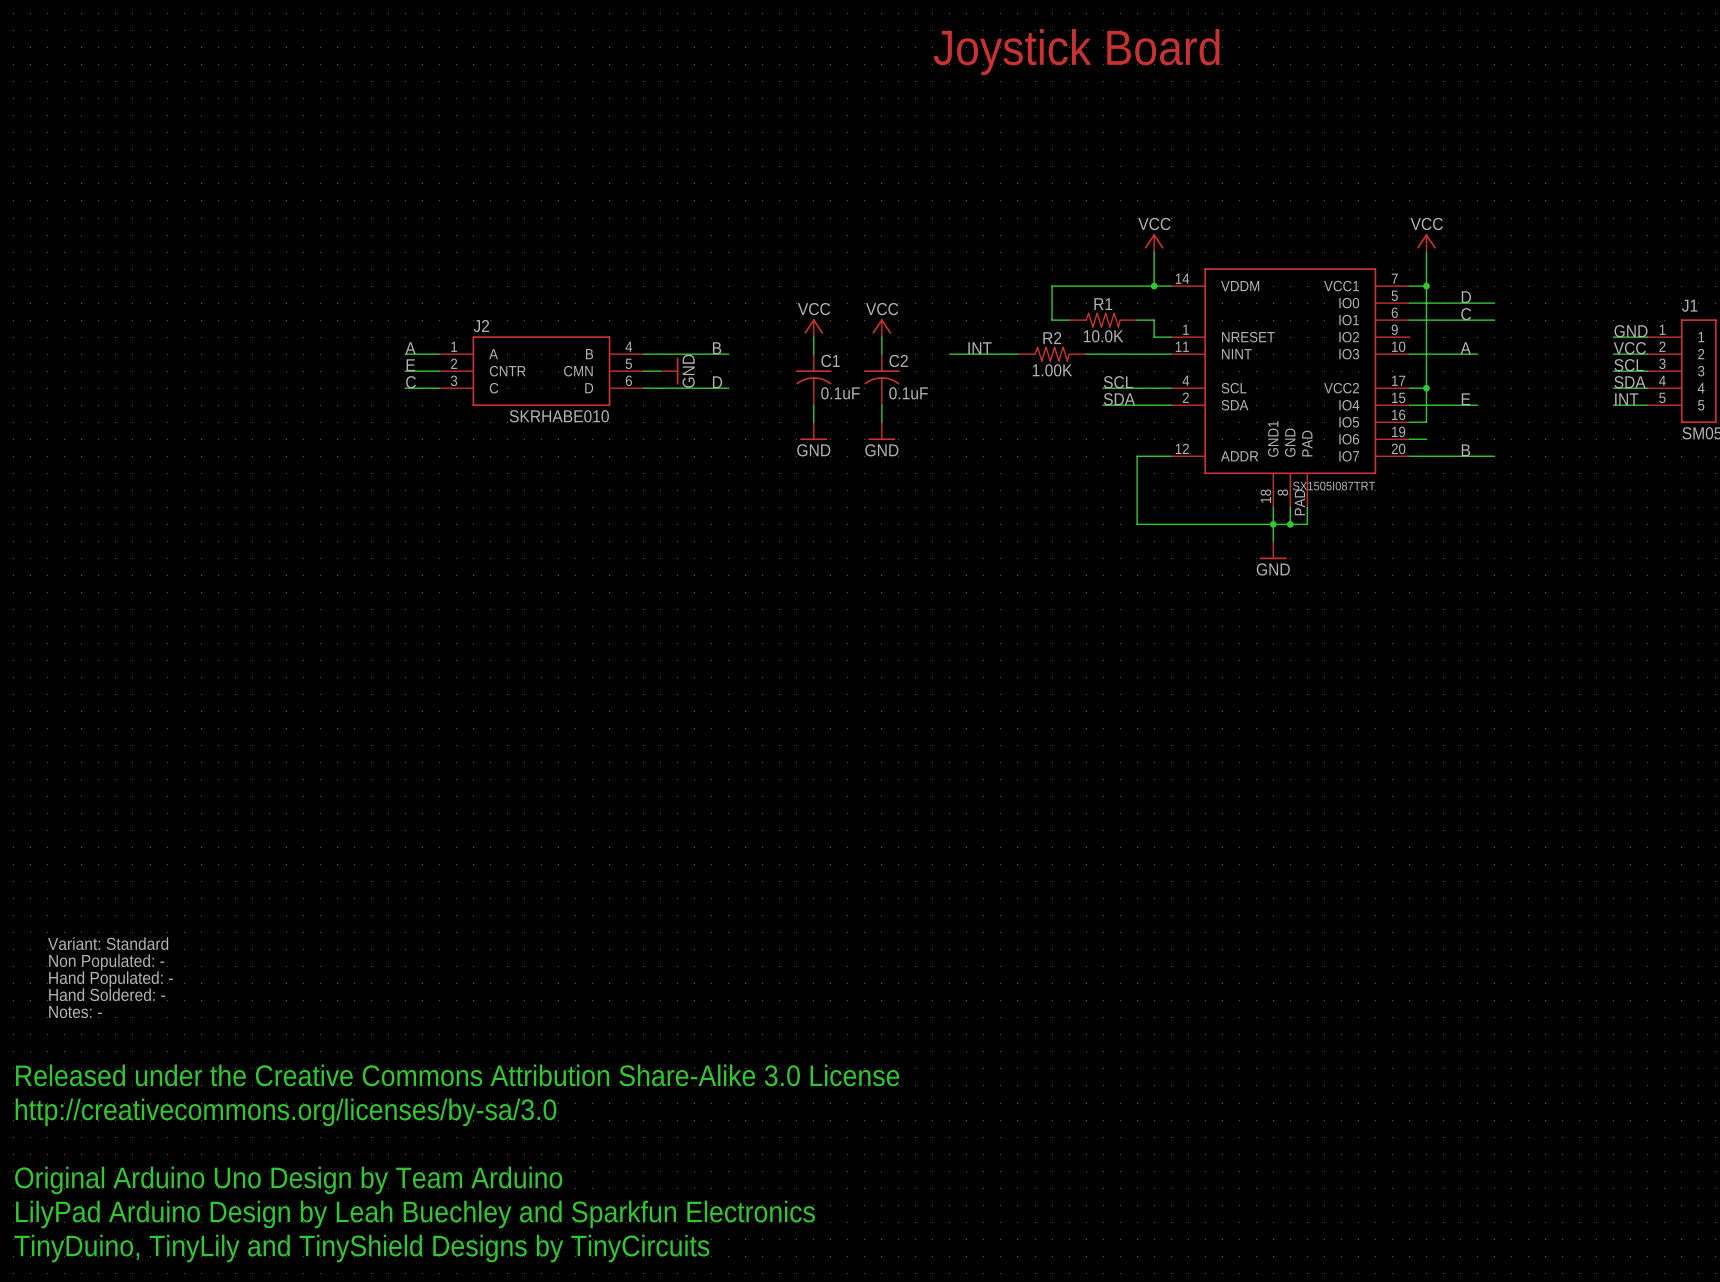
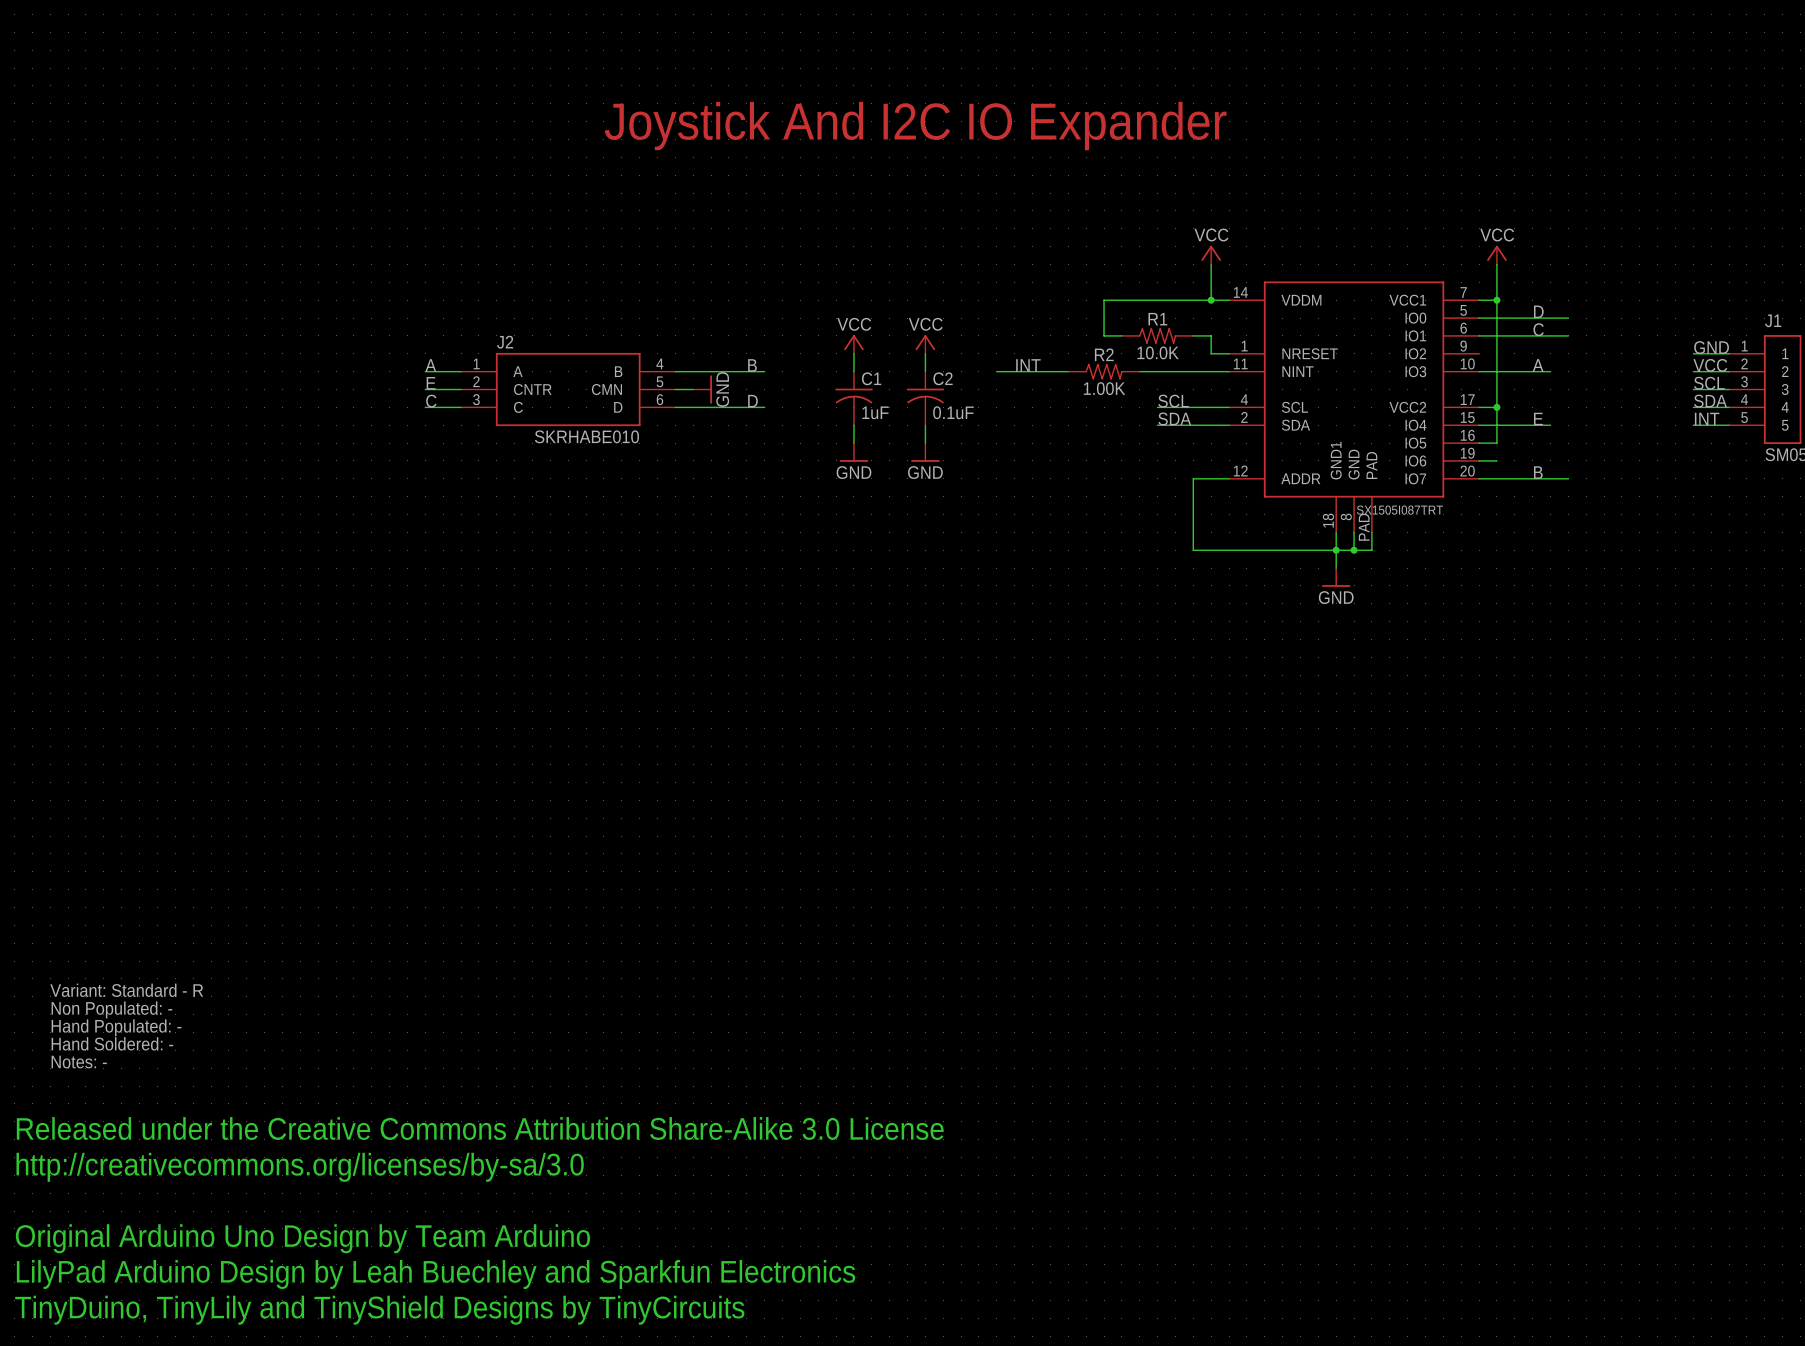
text: Joystick Board (1076, 52) -> none
text: none -> Joystick And I2C IO Expander (915, 126)
C1 value: 0.1uF (840, 393) -> 1uF (875, 412)
text: Variant: Standard (108, 943) -> Variant: Standard - R (126, 990)

